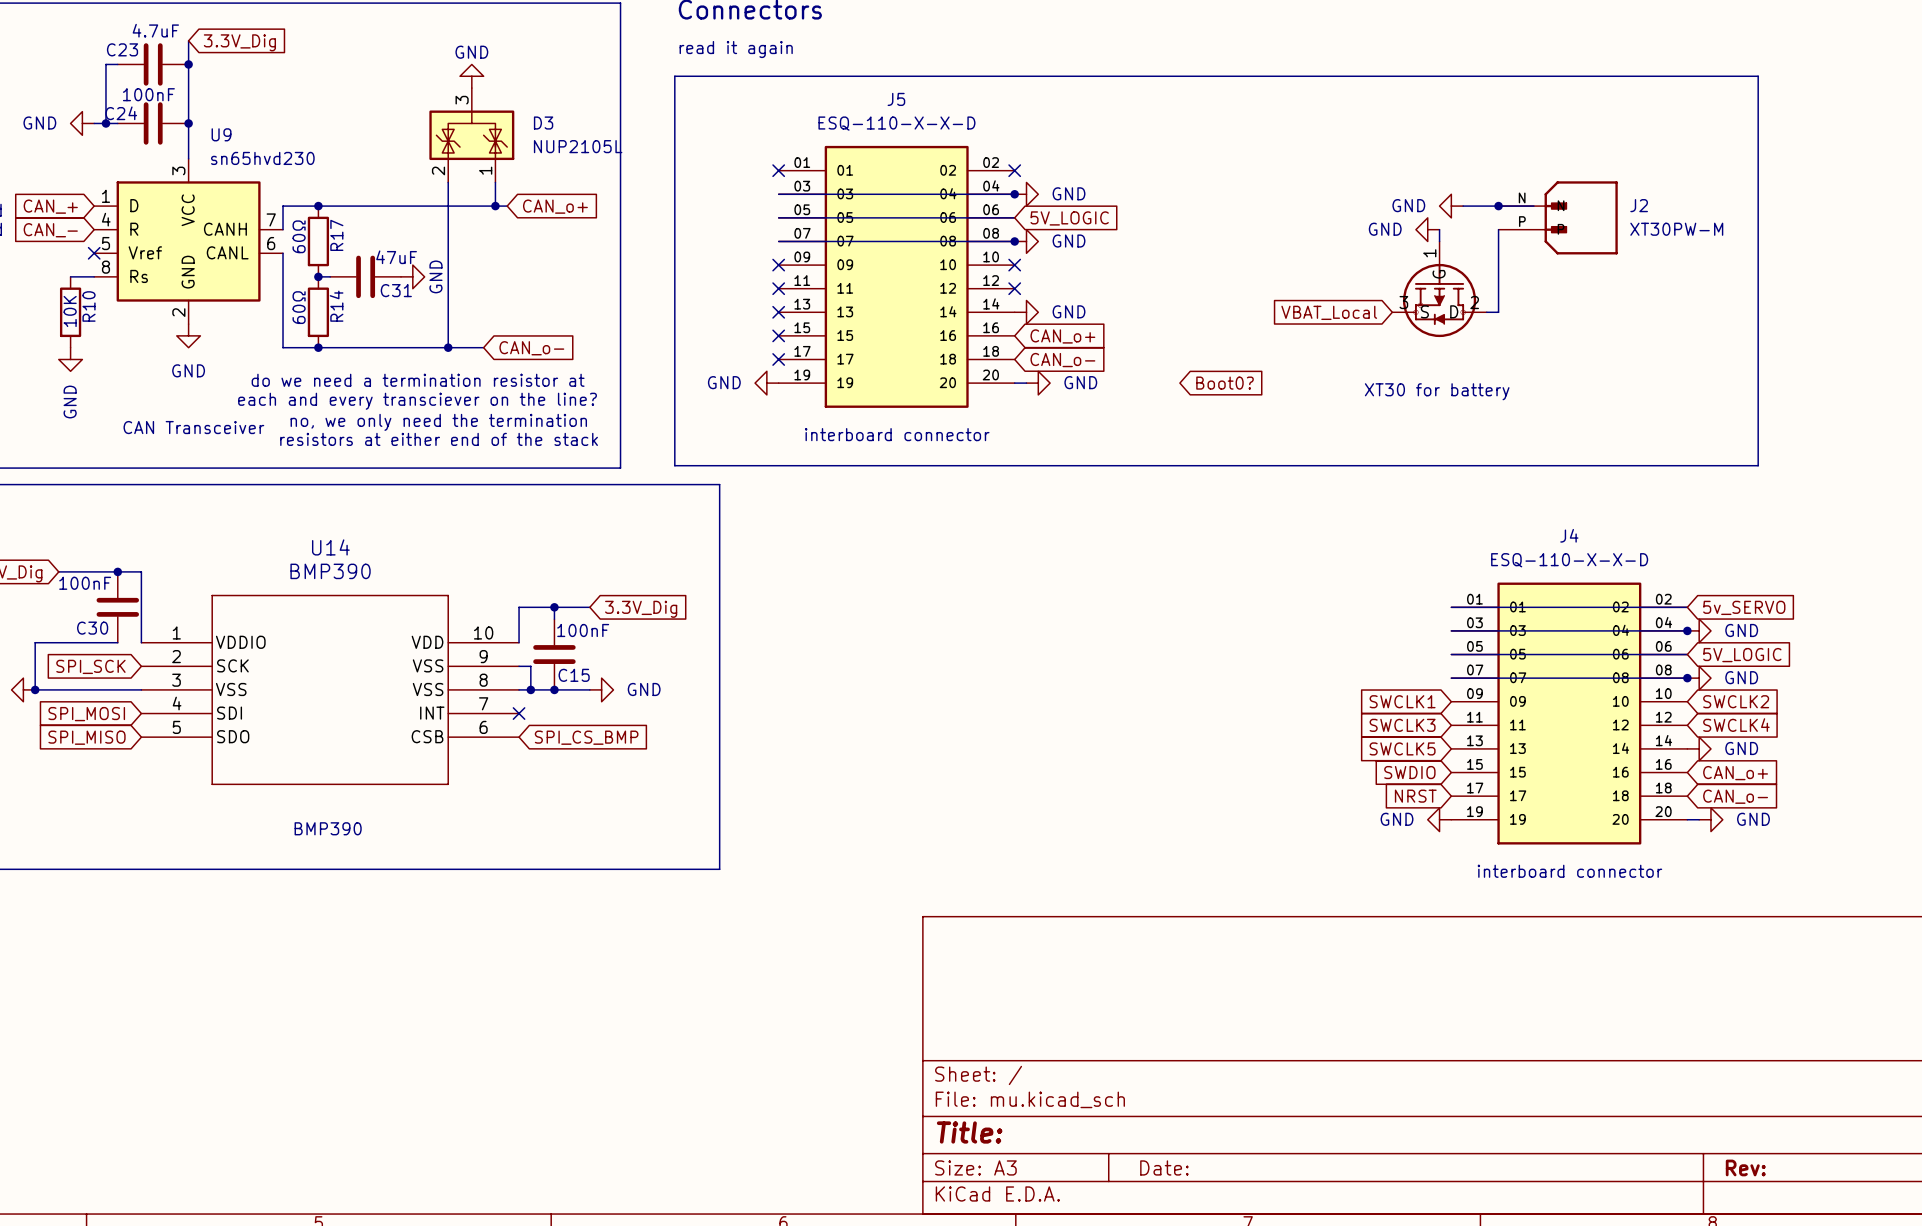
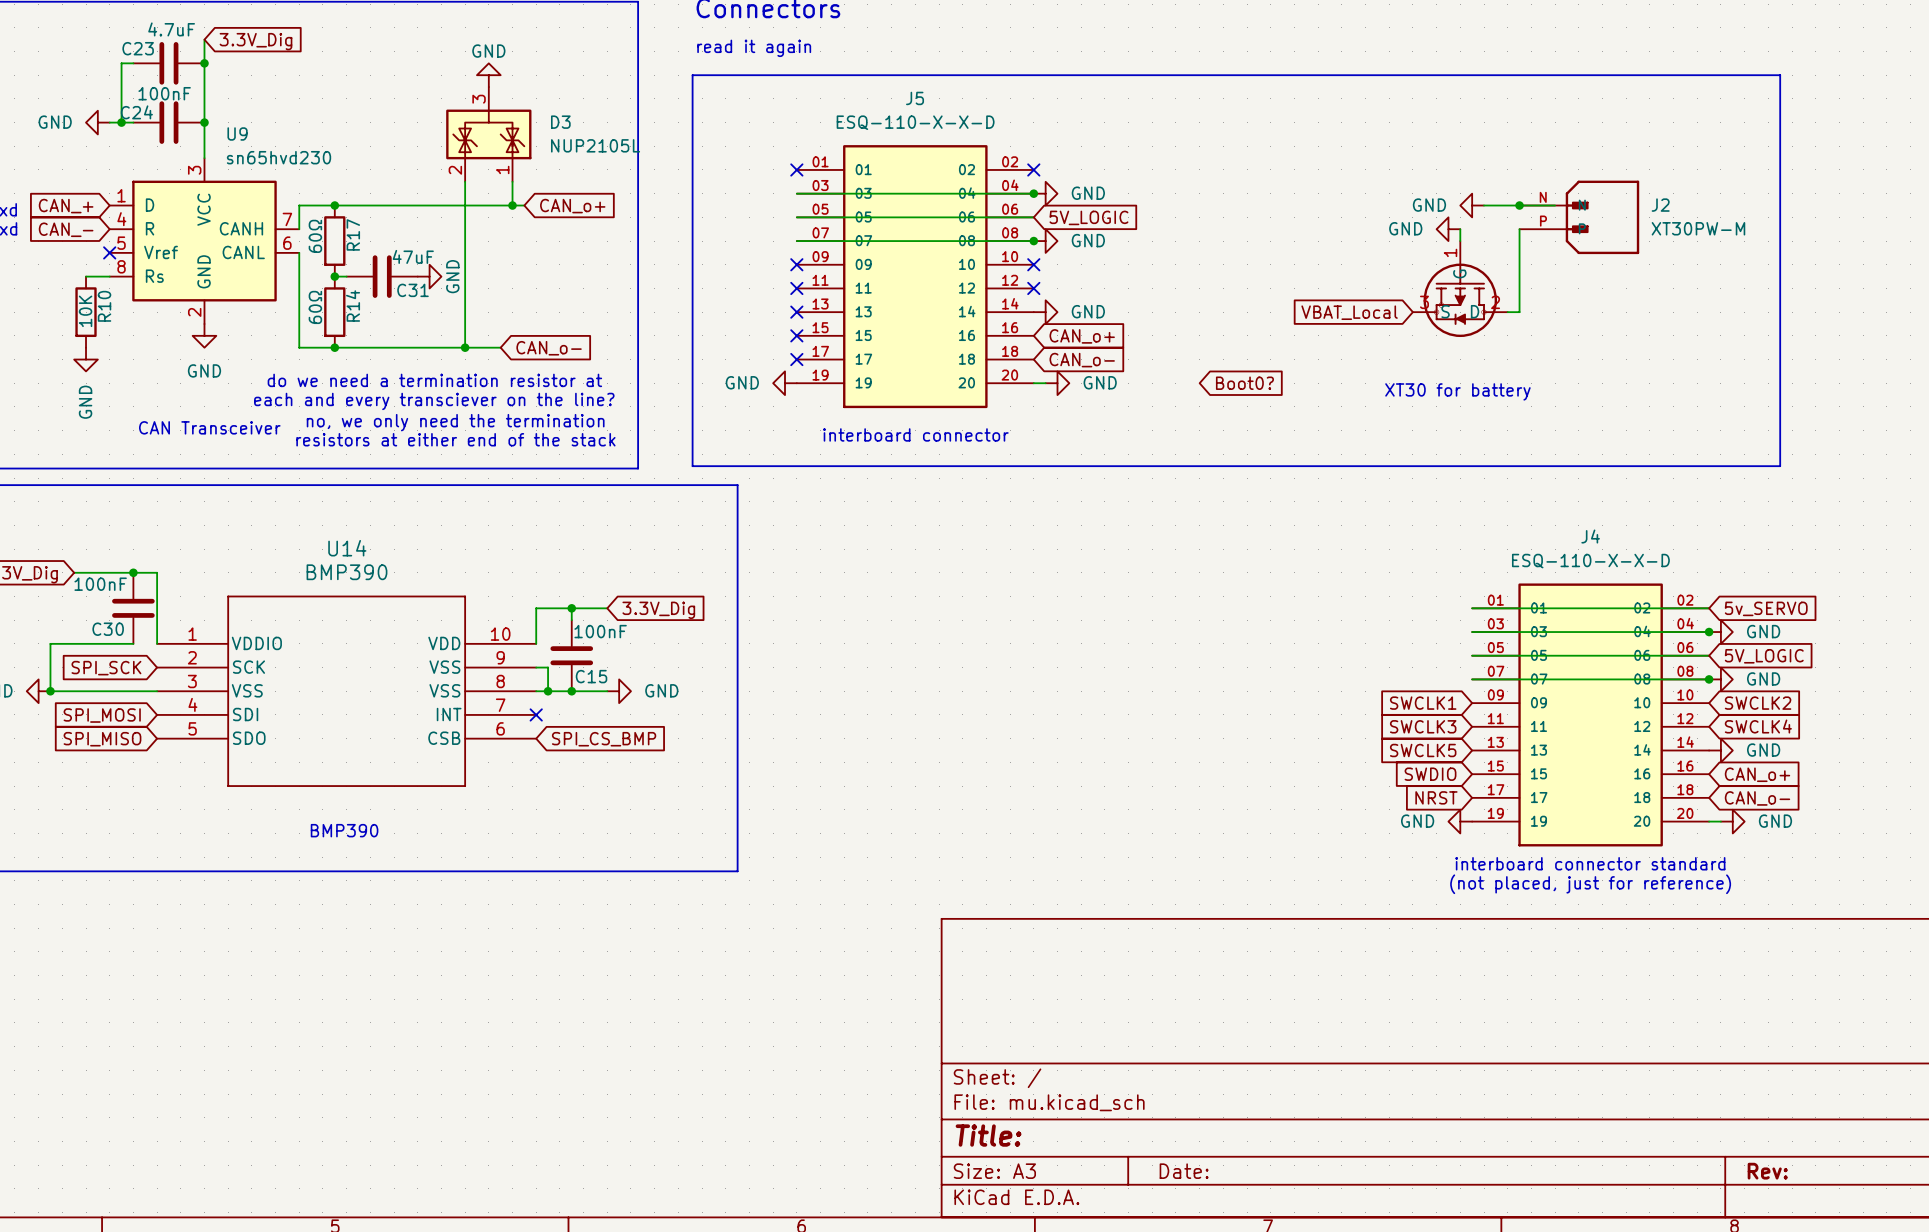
text: interboard connector (1569, 871) -> interboard connector standard (1590, 863)
text: none -> (not placed, just for reference) (1590, 884)

